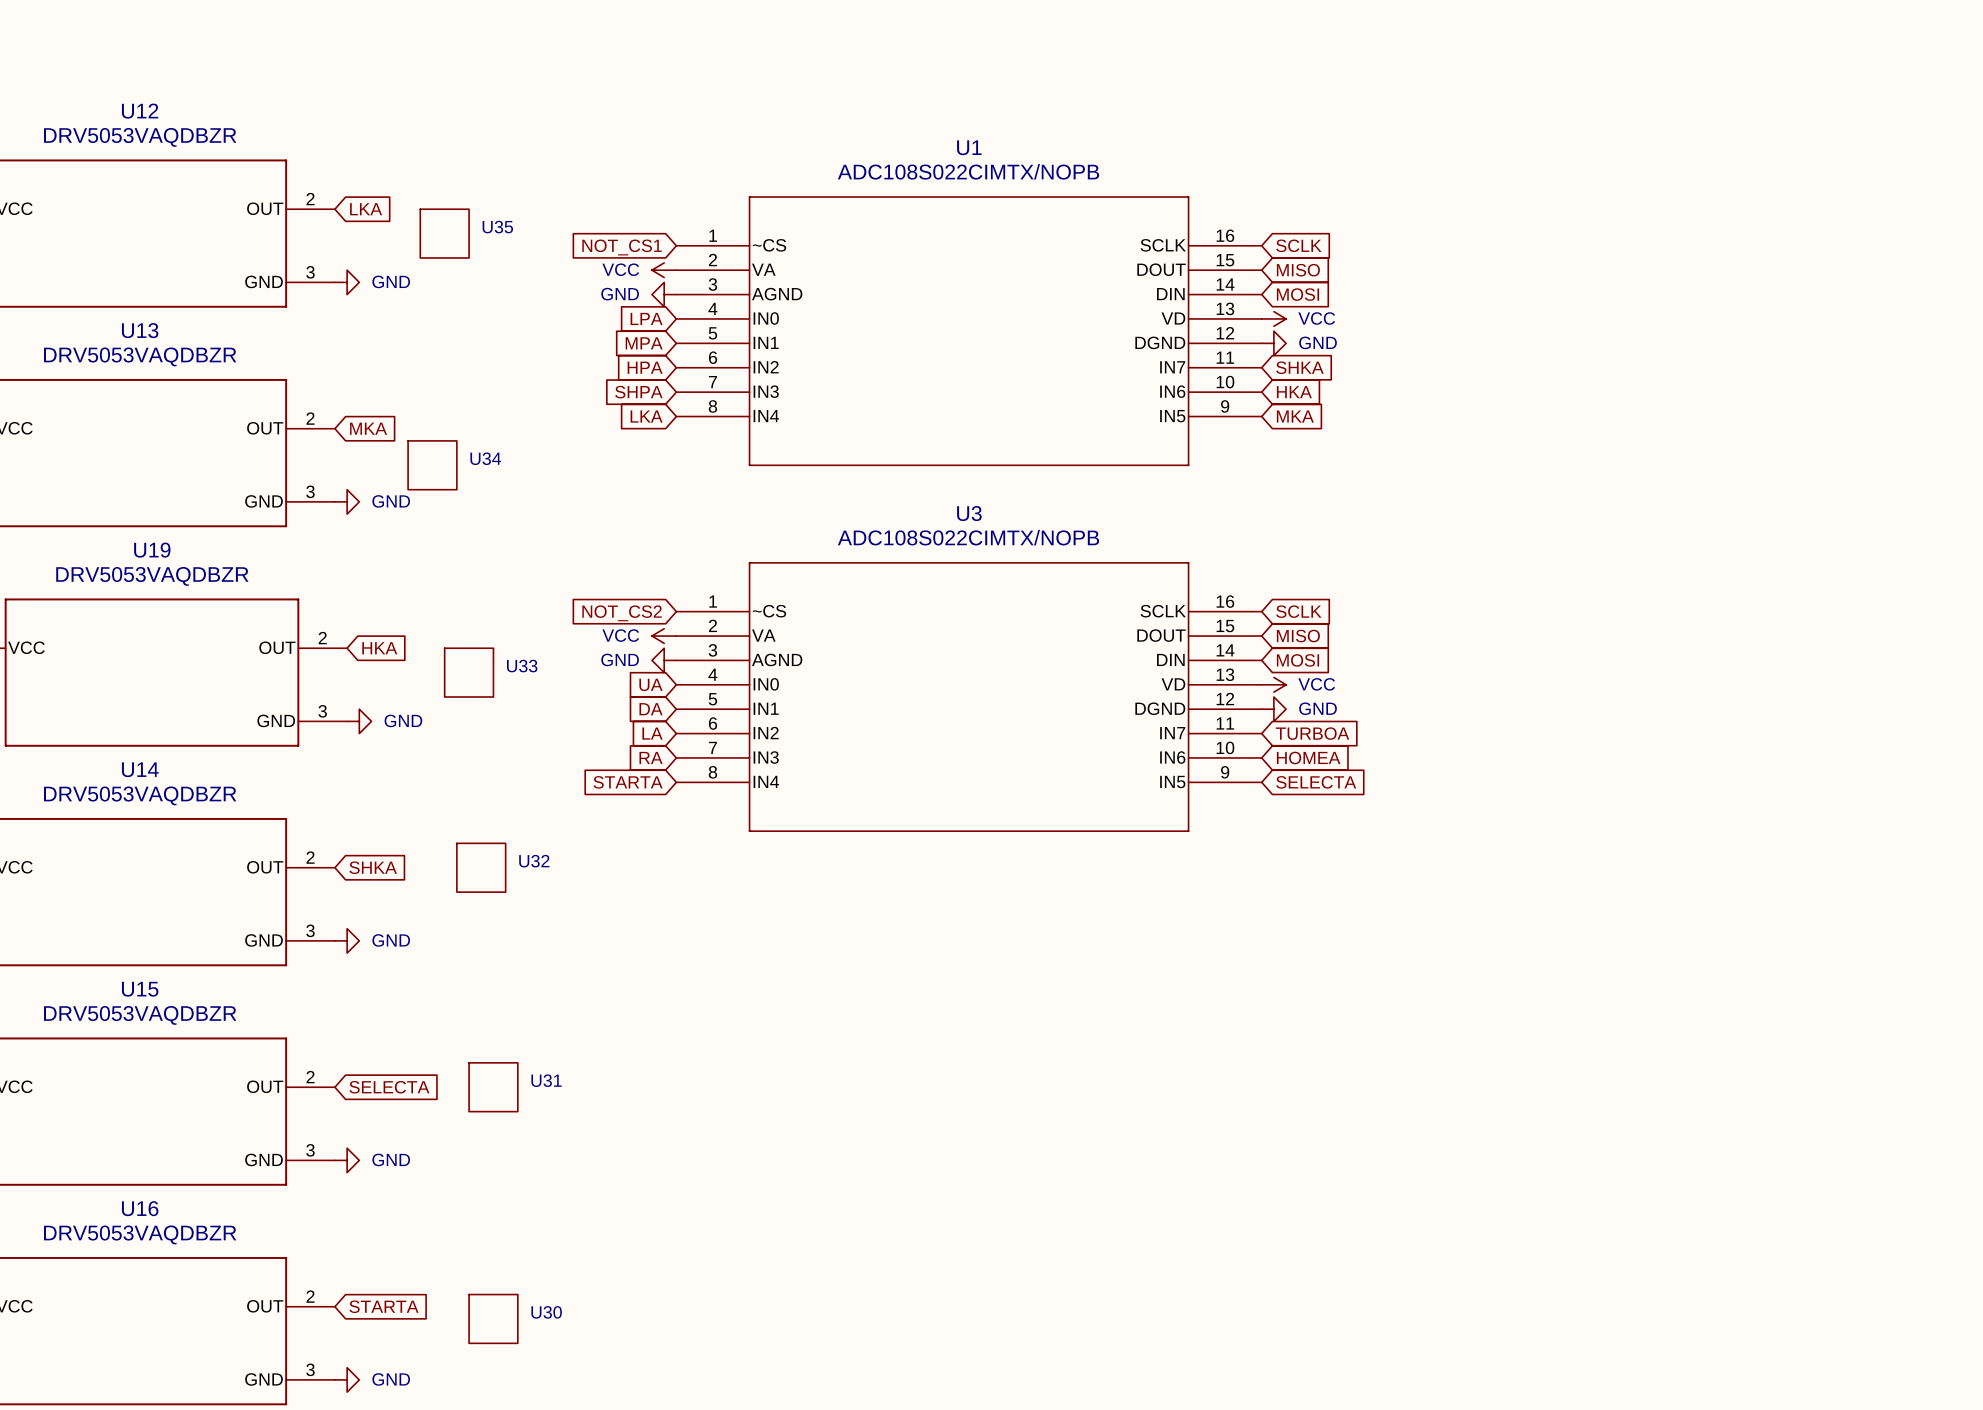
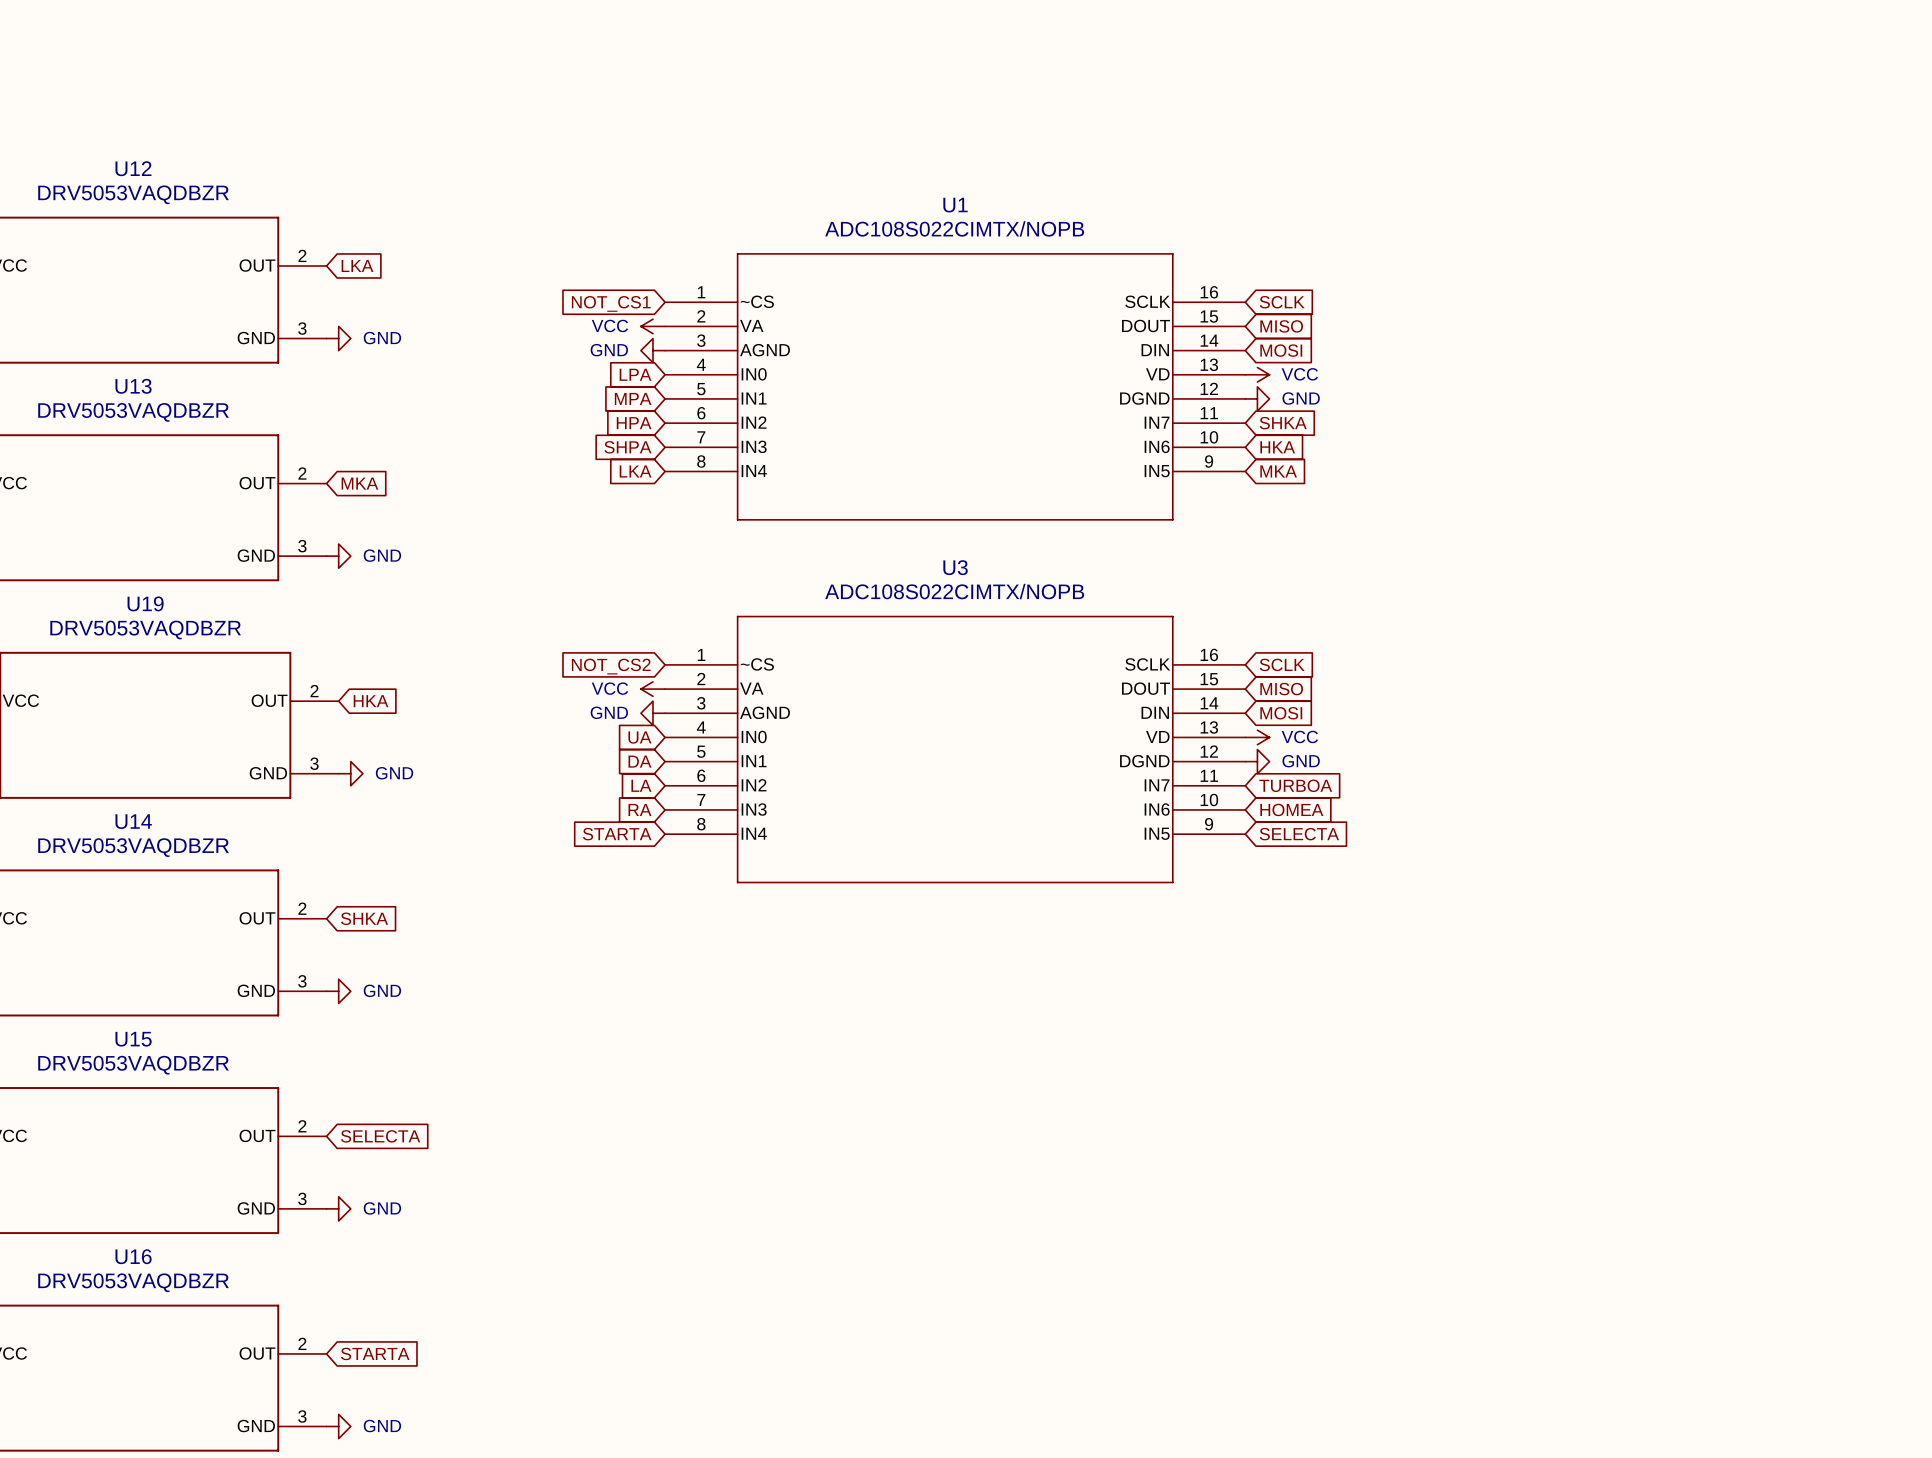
U35: (444, 233) -> none
U34: (432, 465) -> none
U33: (469, 672) -> none
U32: (481, 867) -> none
U31: (493, 1087) -> none
U30: (493, 1318) -> none

